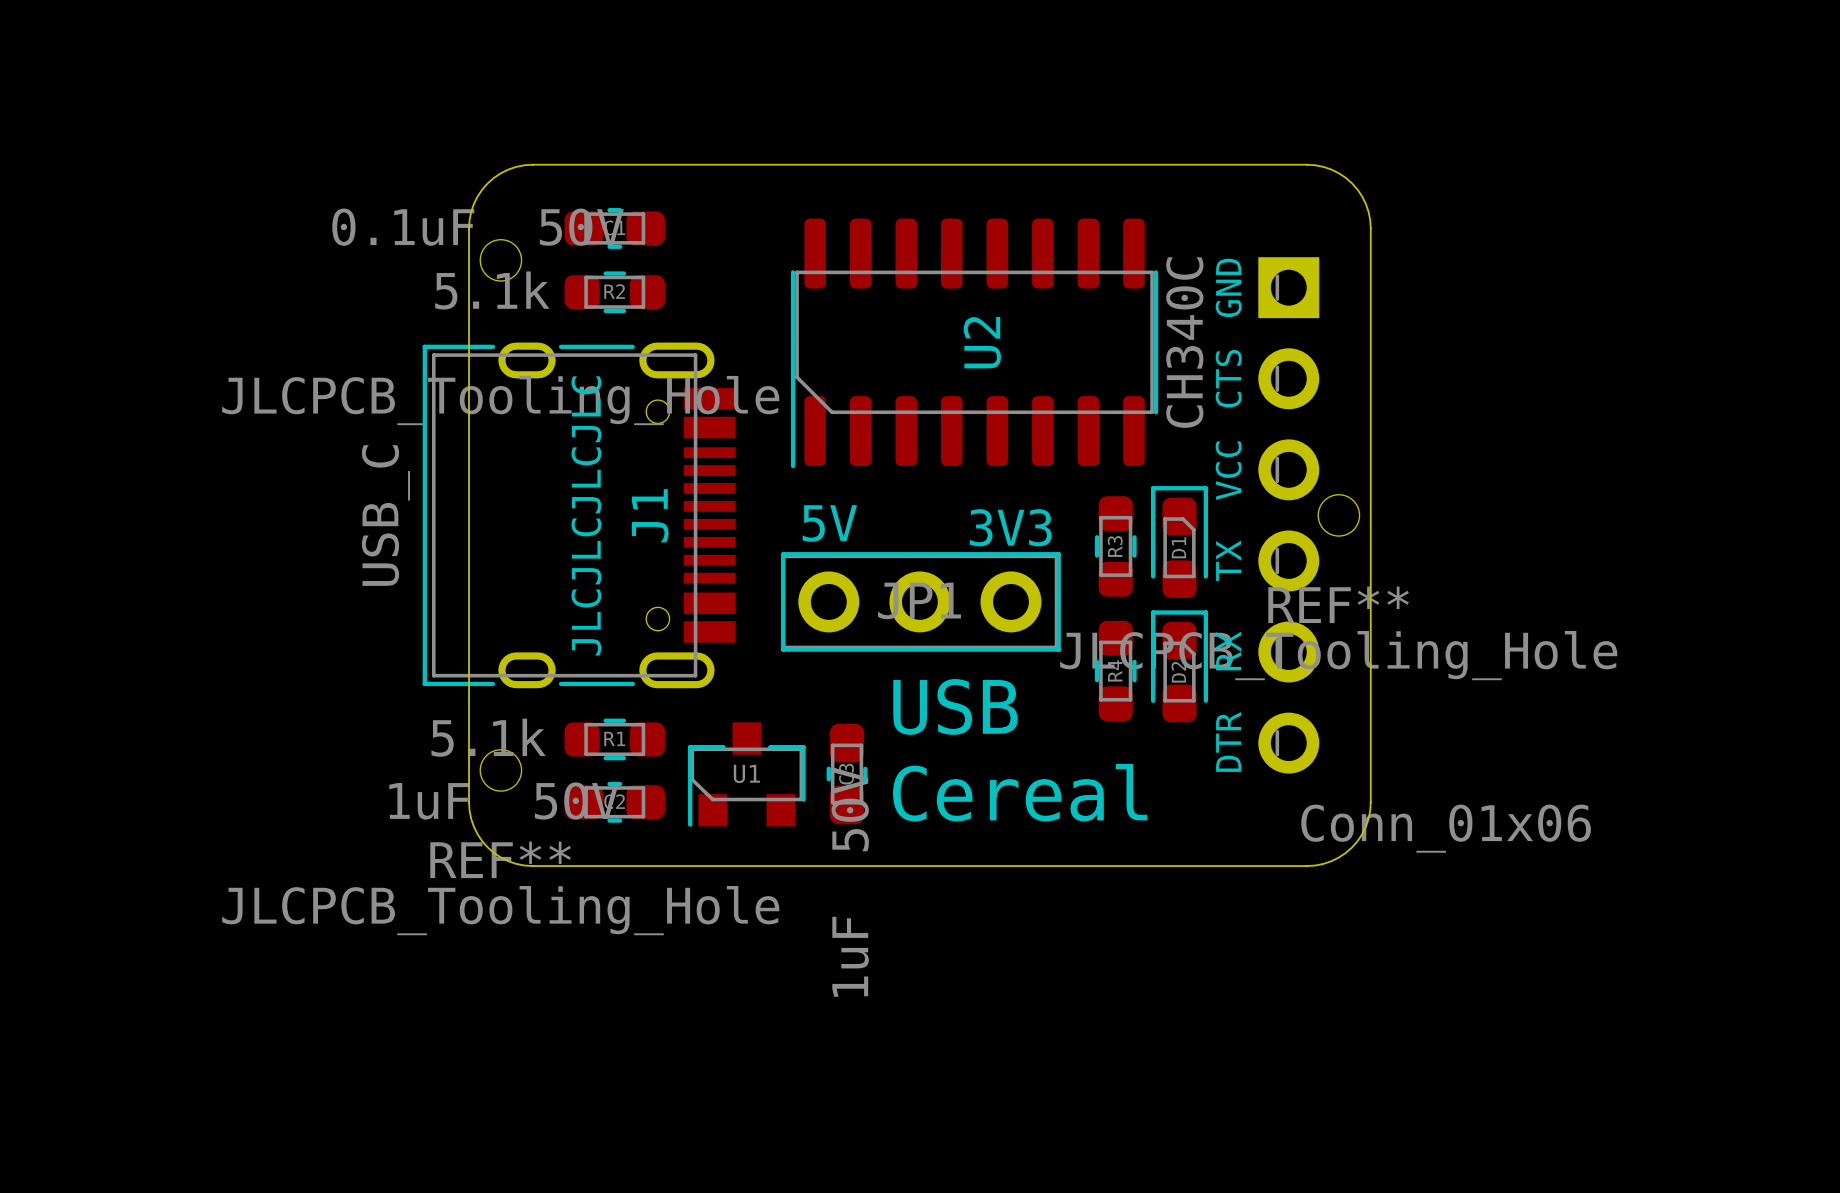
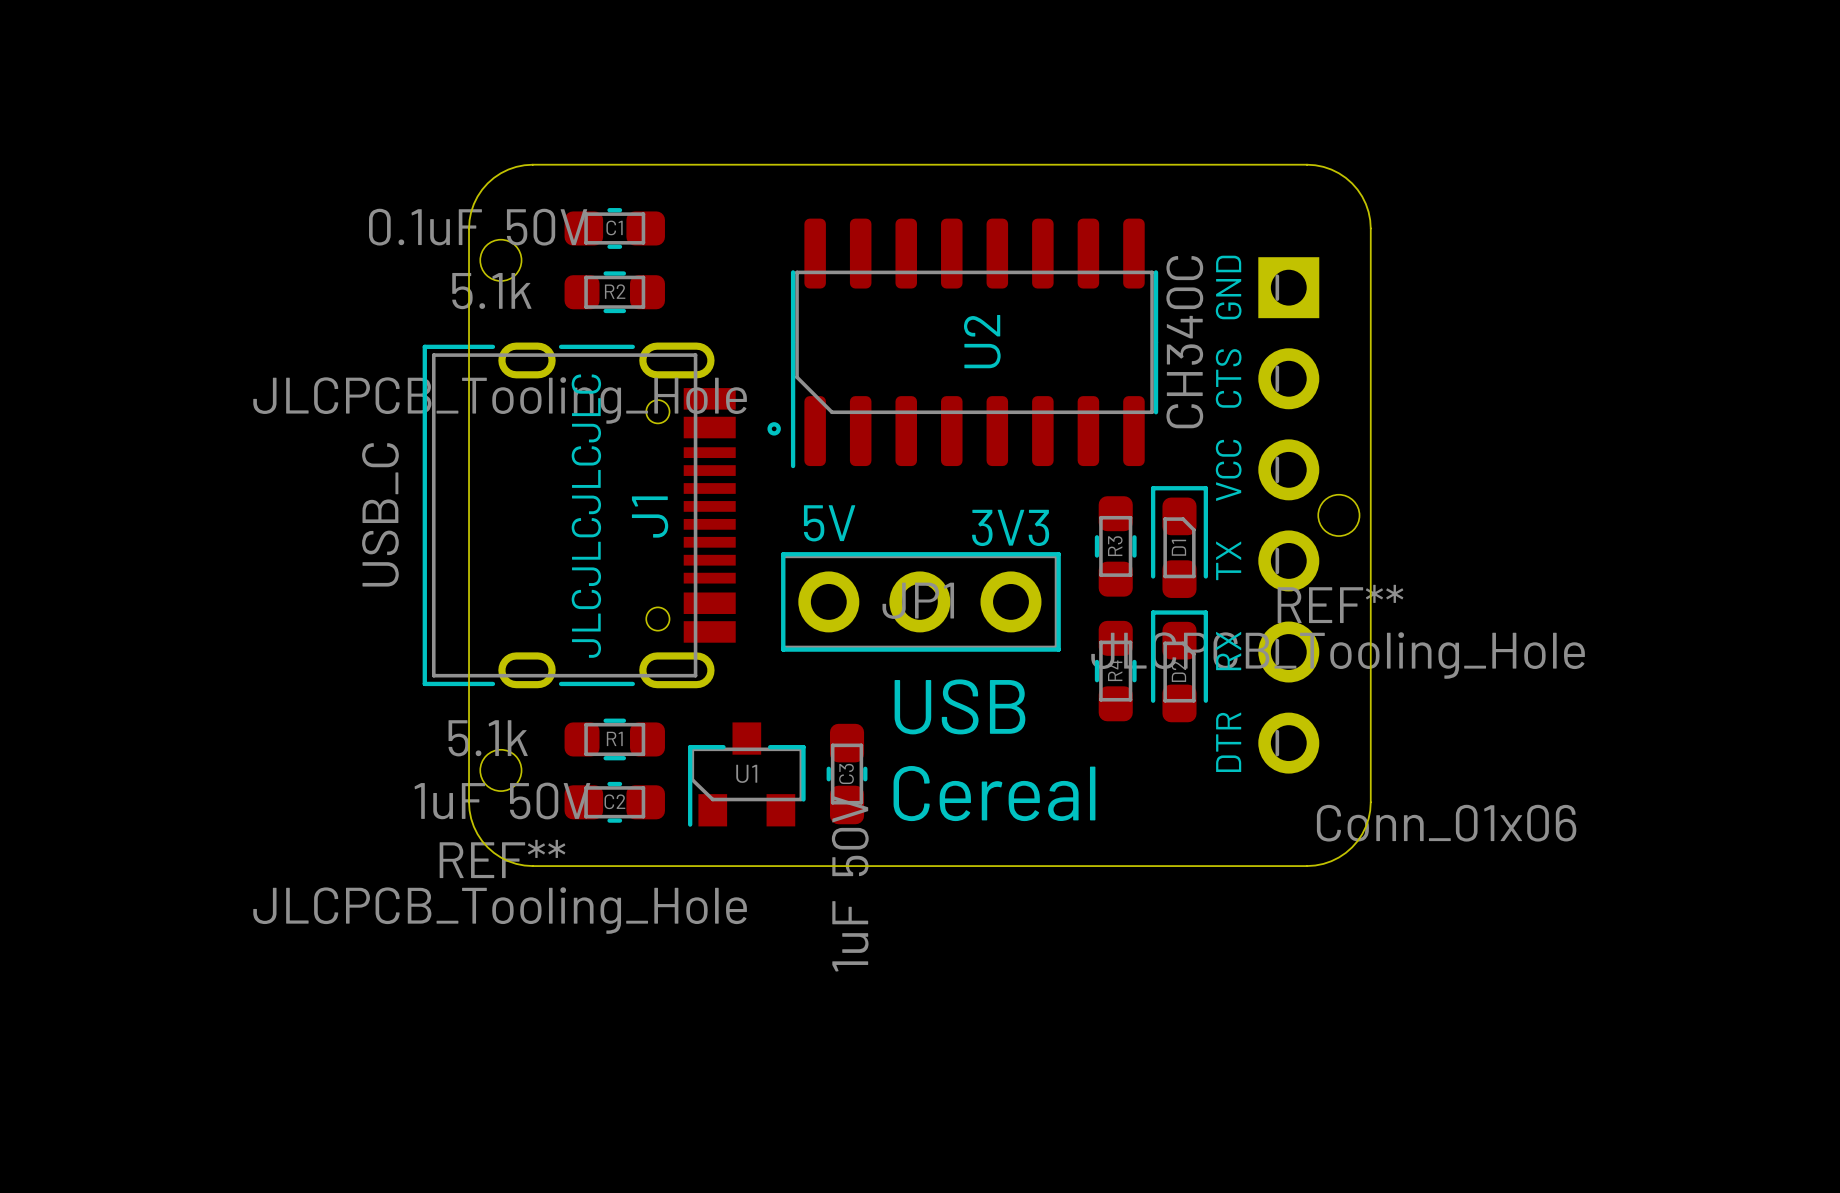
drawing: none -> [767, 422, 781, 436]

